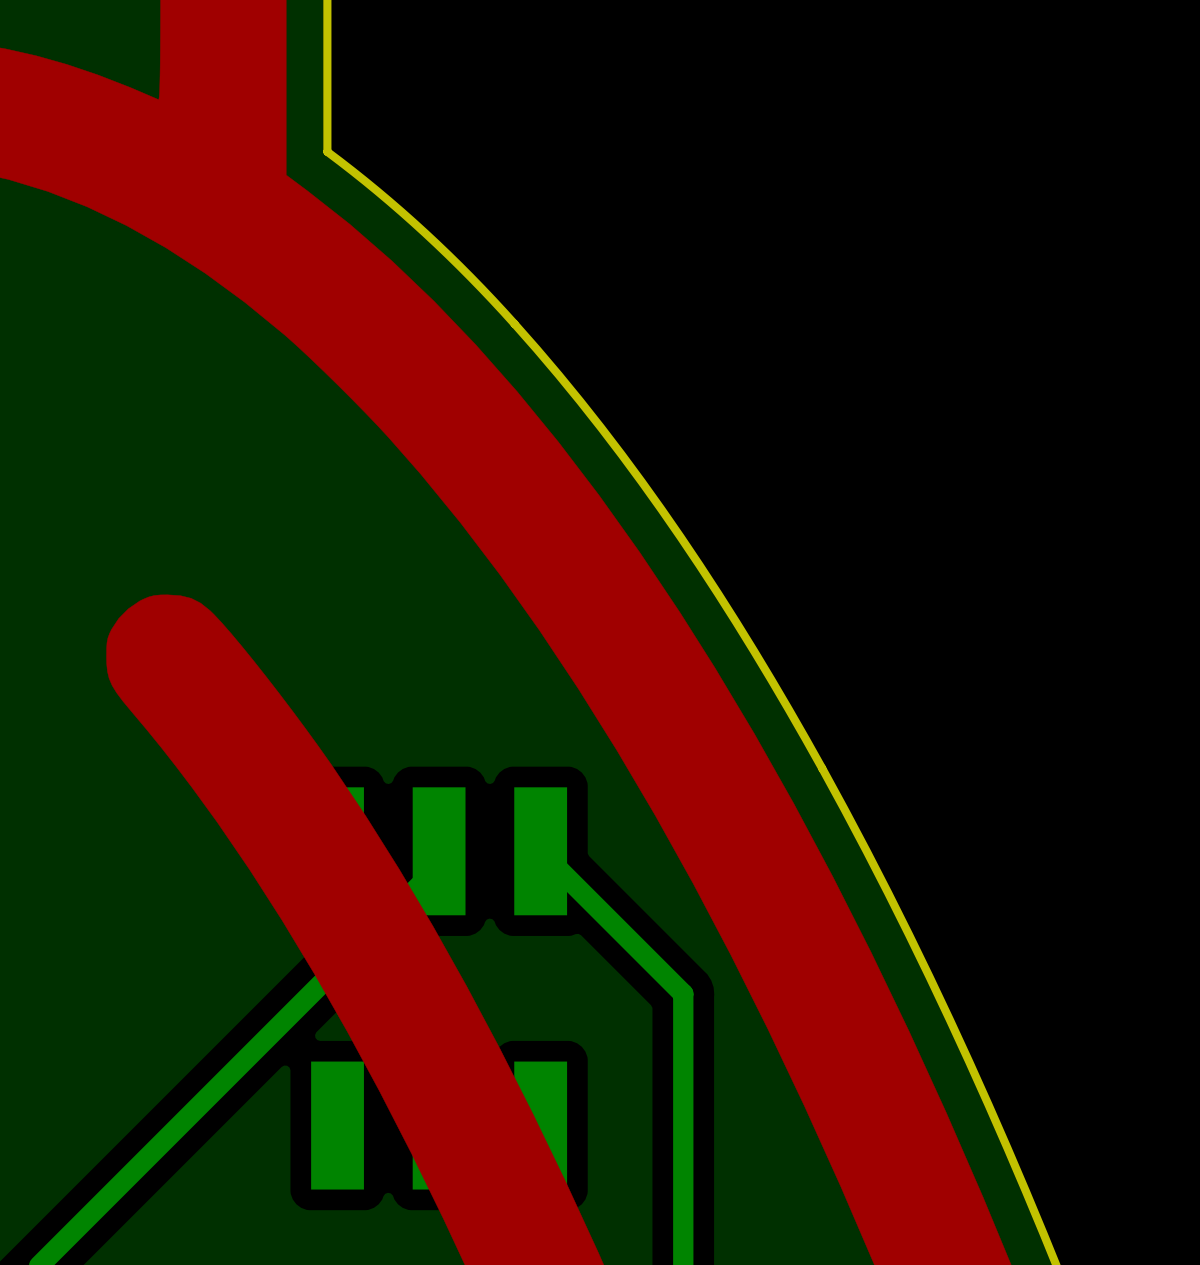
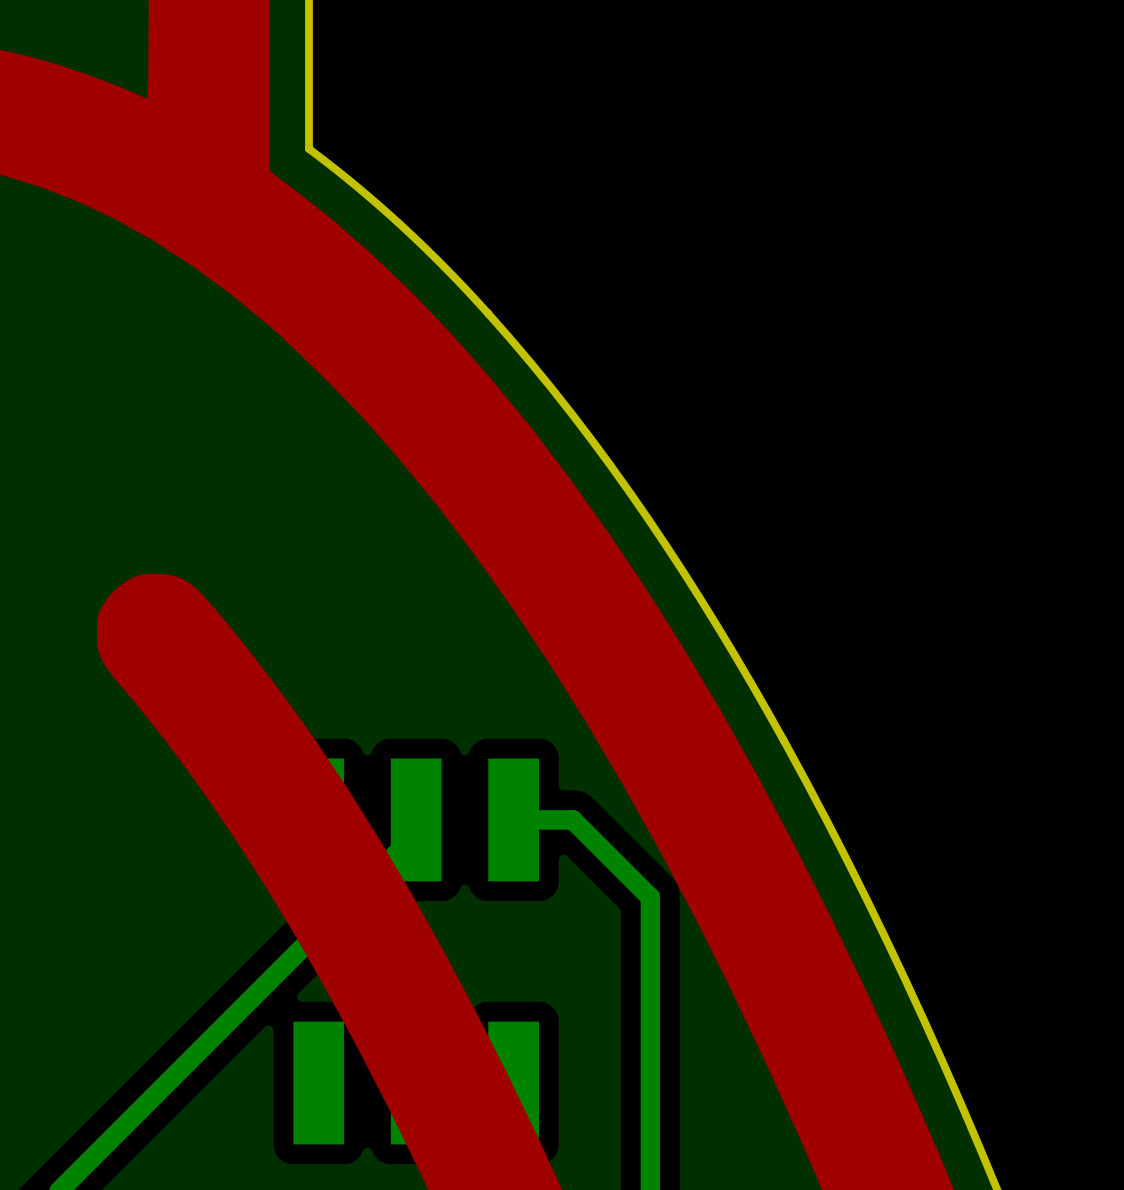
bottom track: (540, 851) (683, 993) -> (513, 819) (572, 819) (650, 897) (650, 956)

